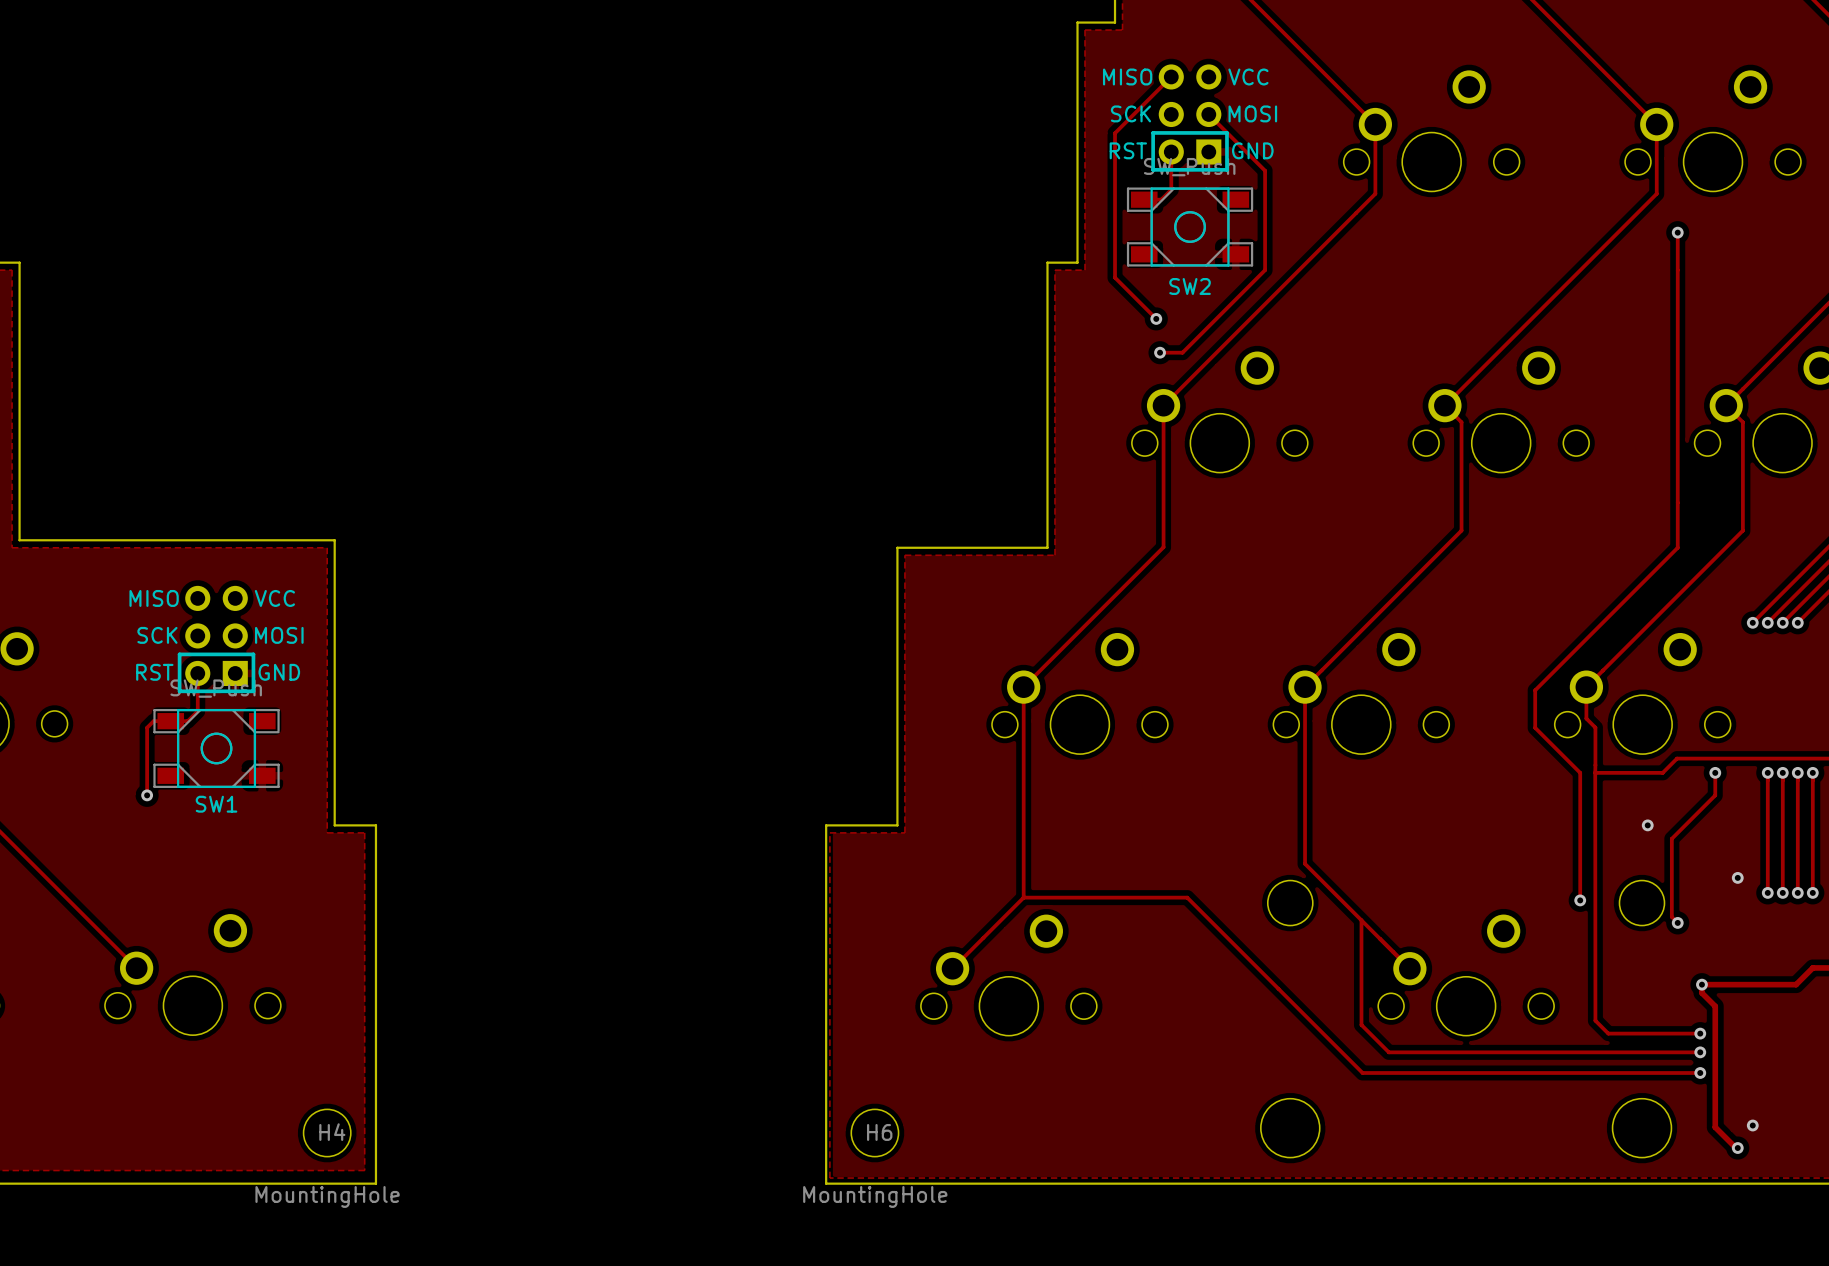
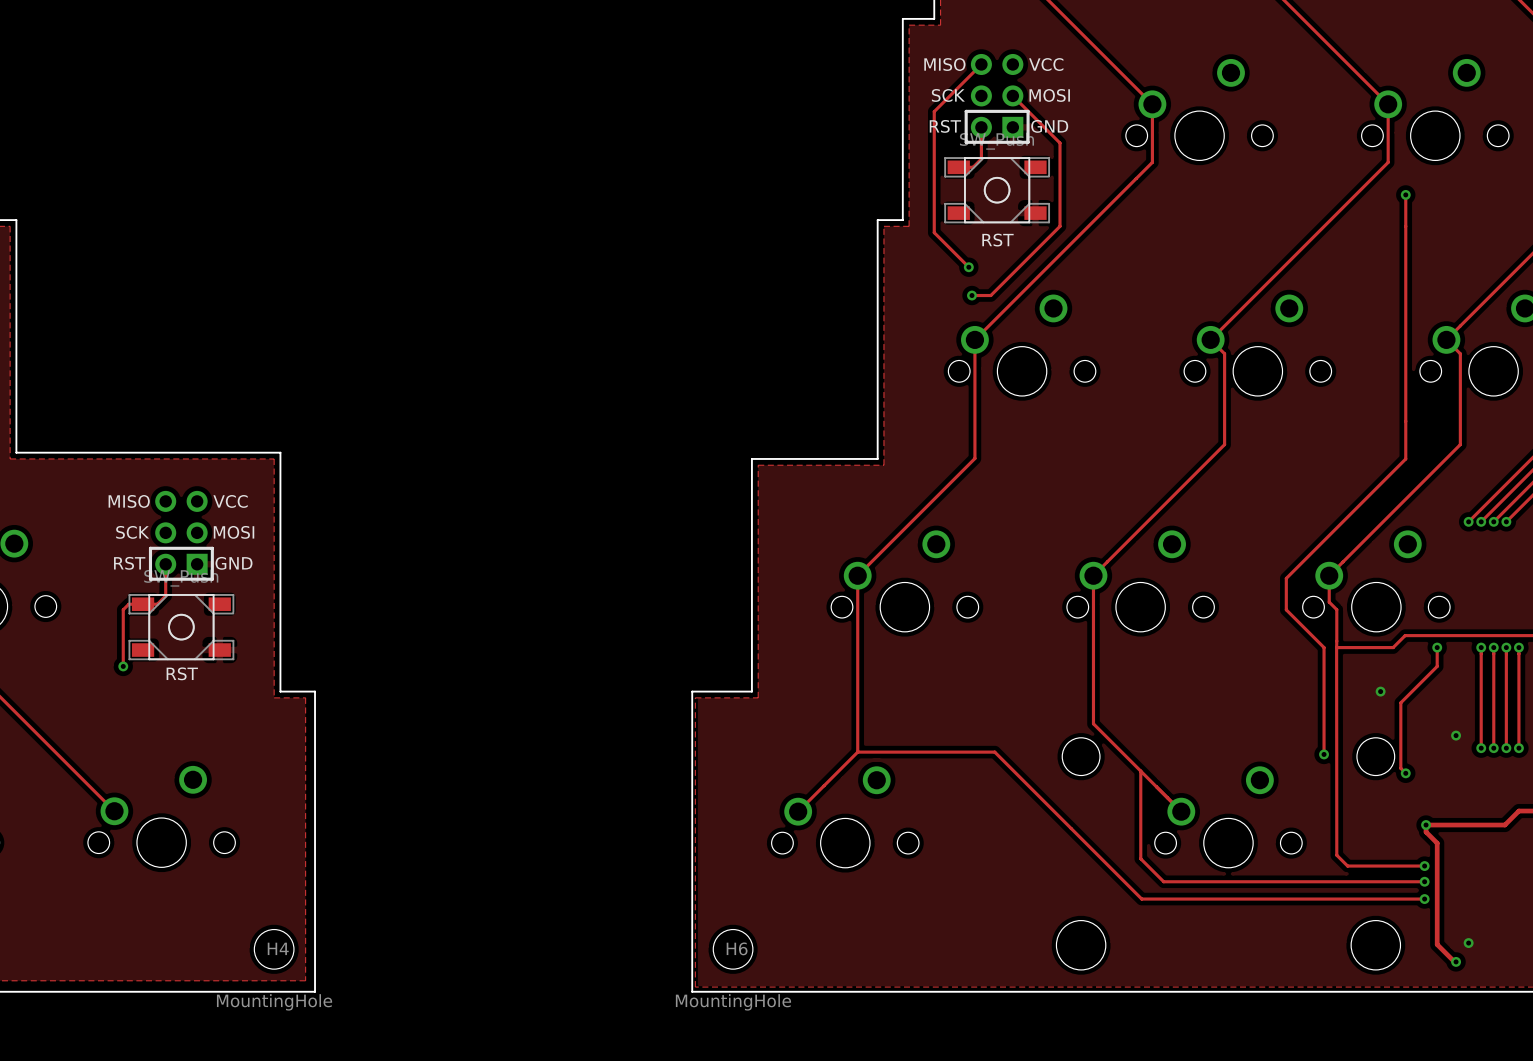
SW2 name: SW2 (1190, 286) -> RST (997, 240)
SW1 name: SW1 (216, 804) -> RST (182, 673)

